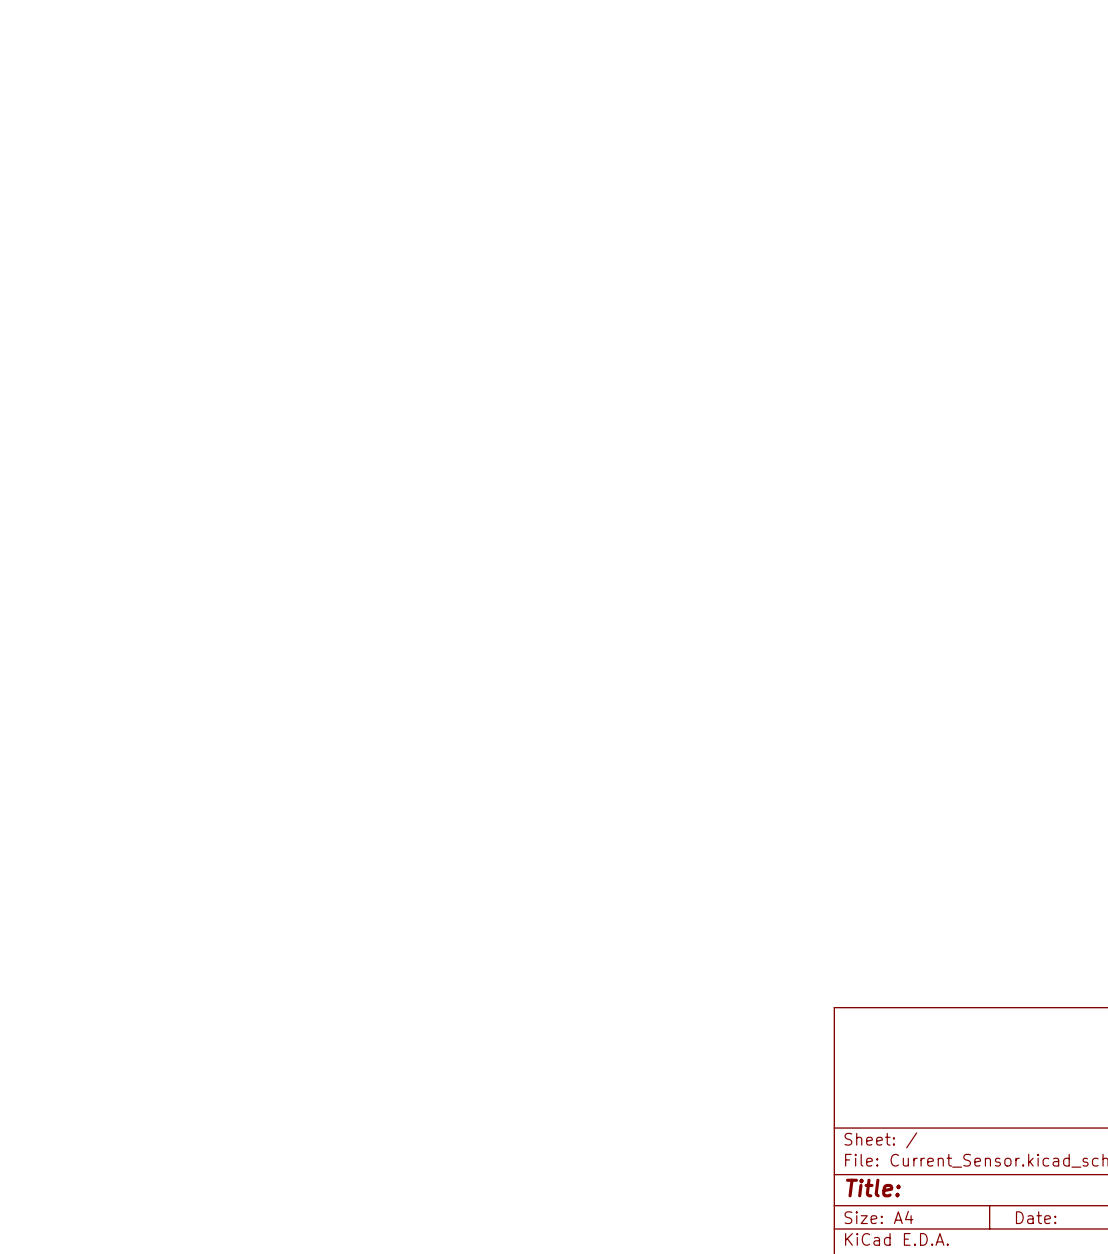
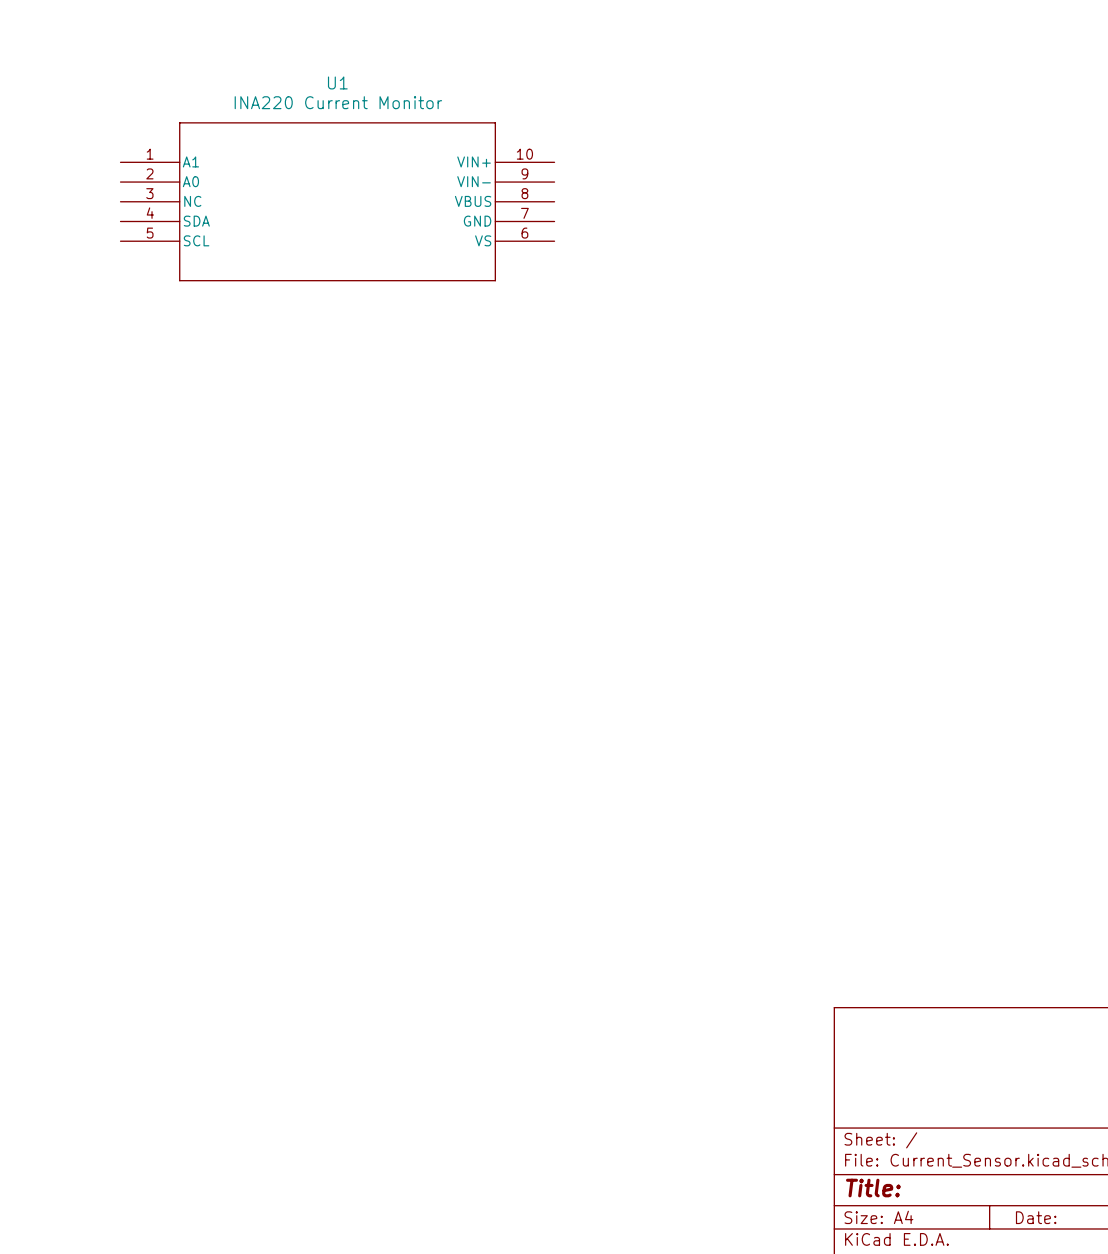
U1: none -> INA220 Current Monitor (337, 201)

